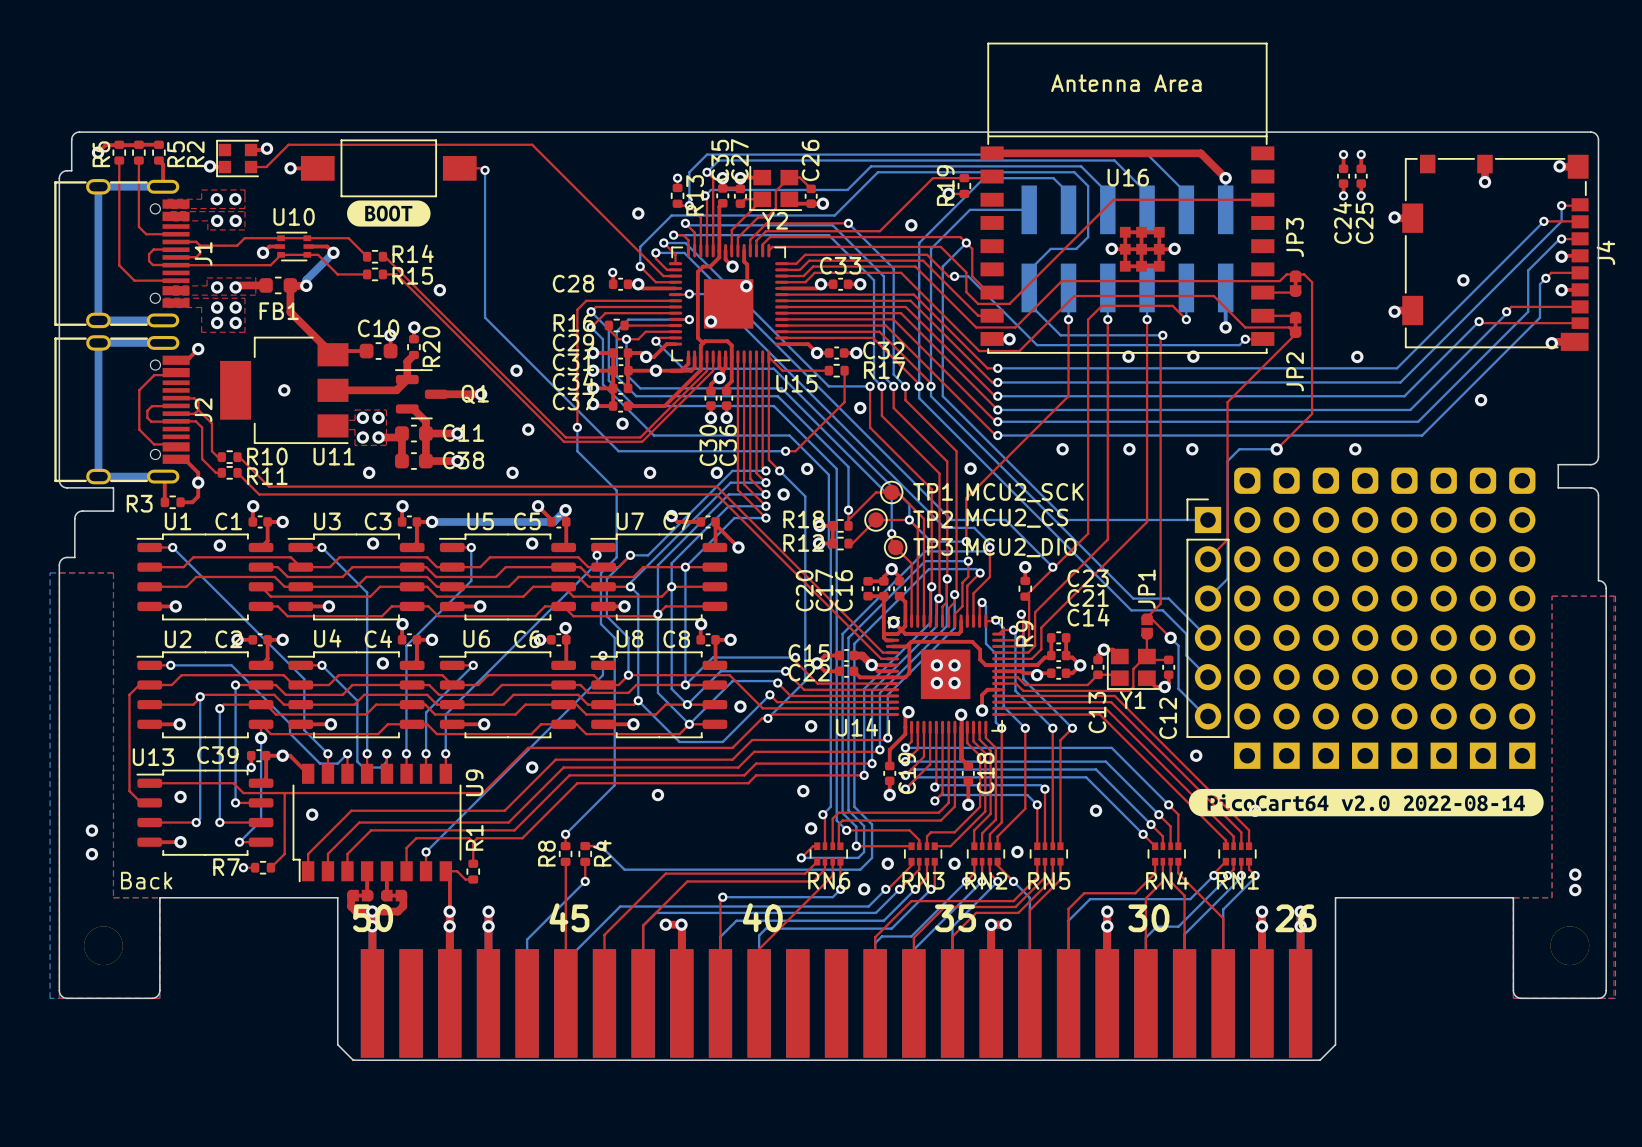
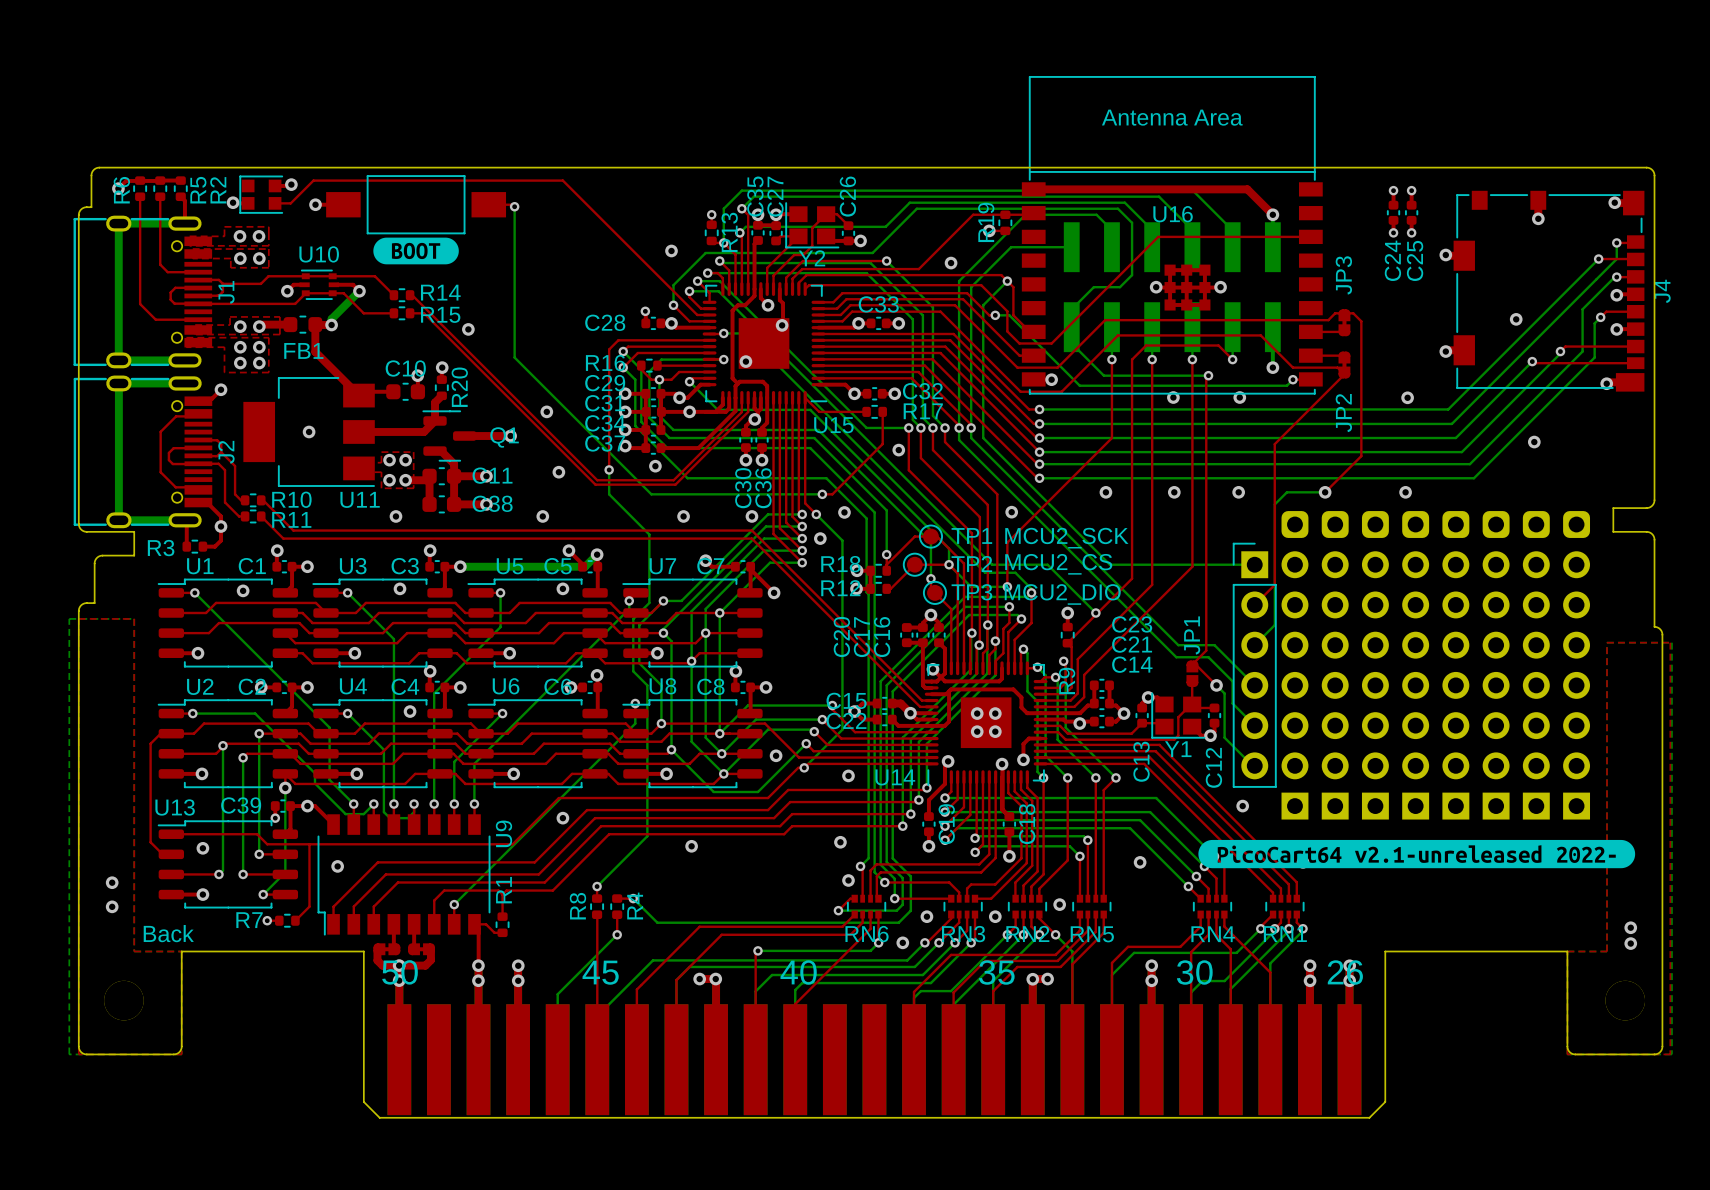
drawing shape: [1188, 788, 1544, 817] -> [1198, 839, 1636, 869]

